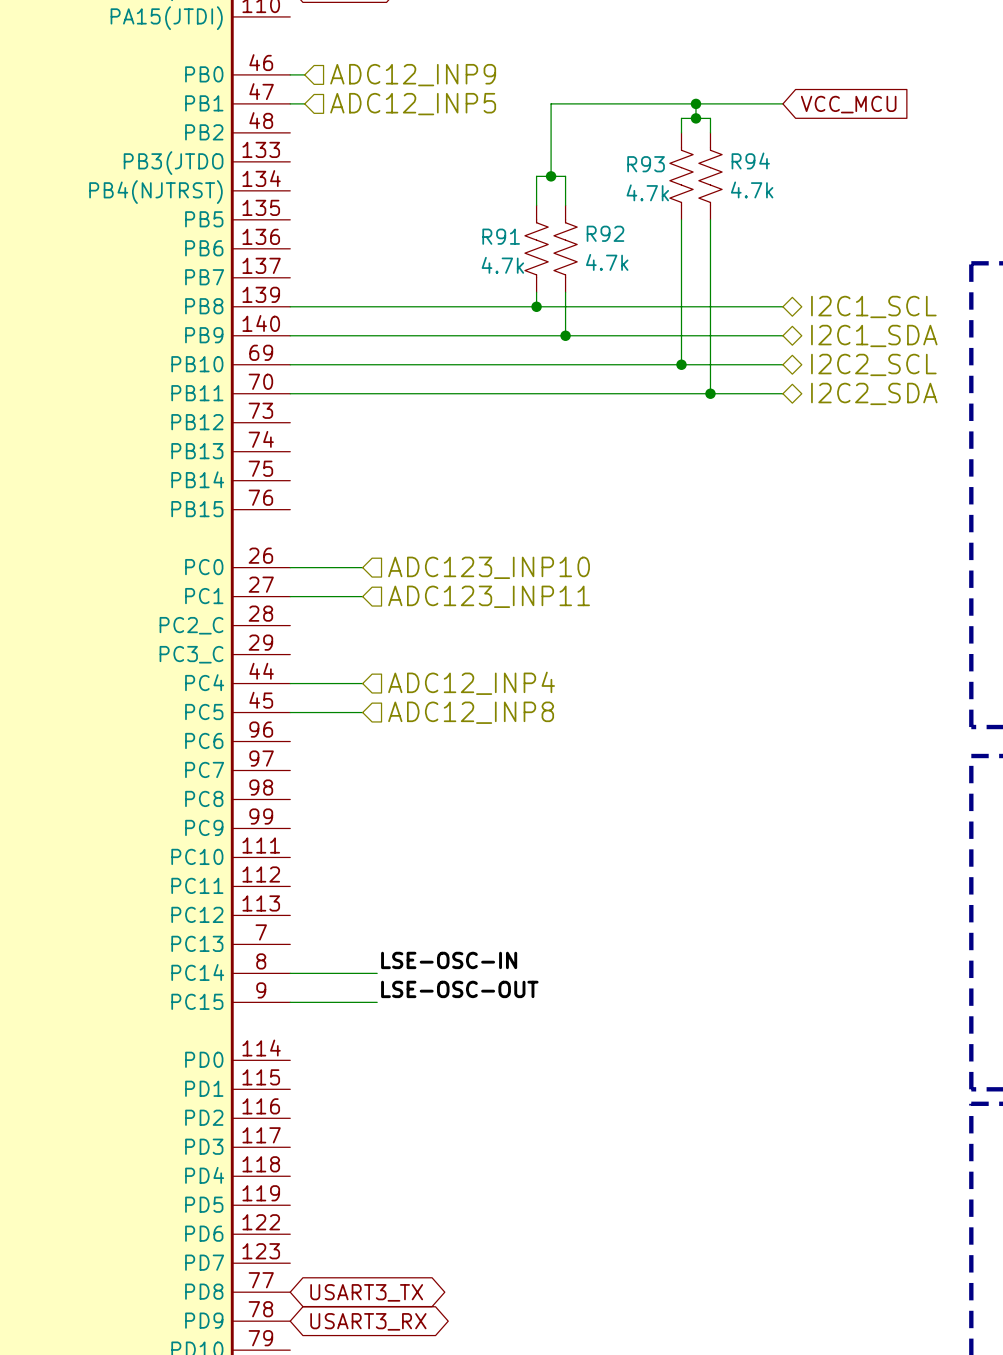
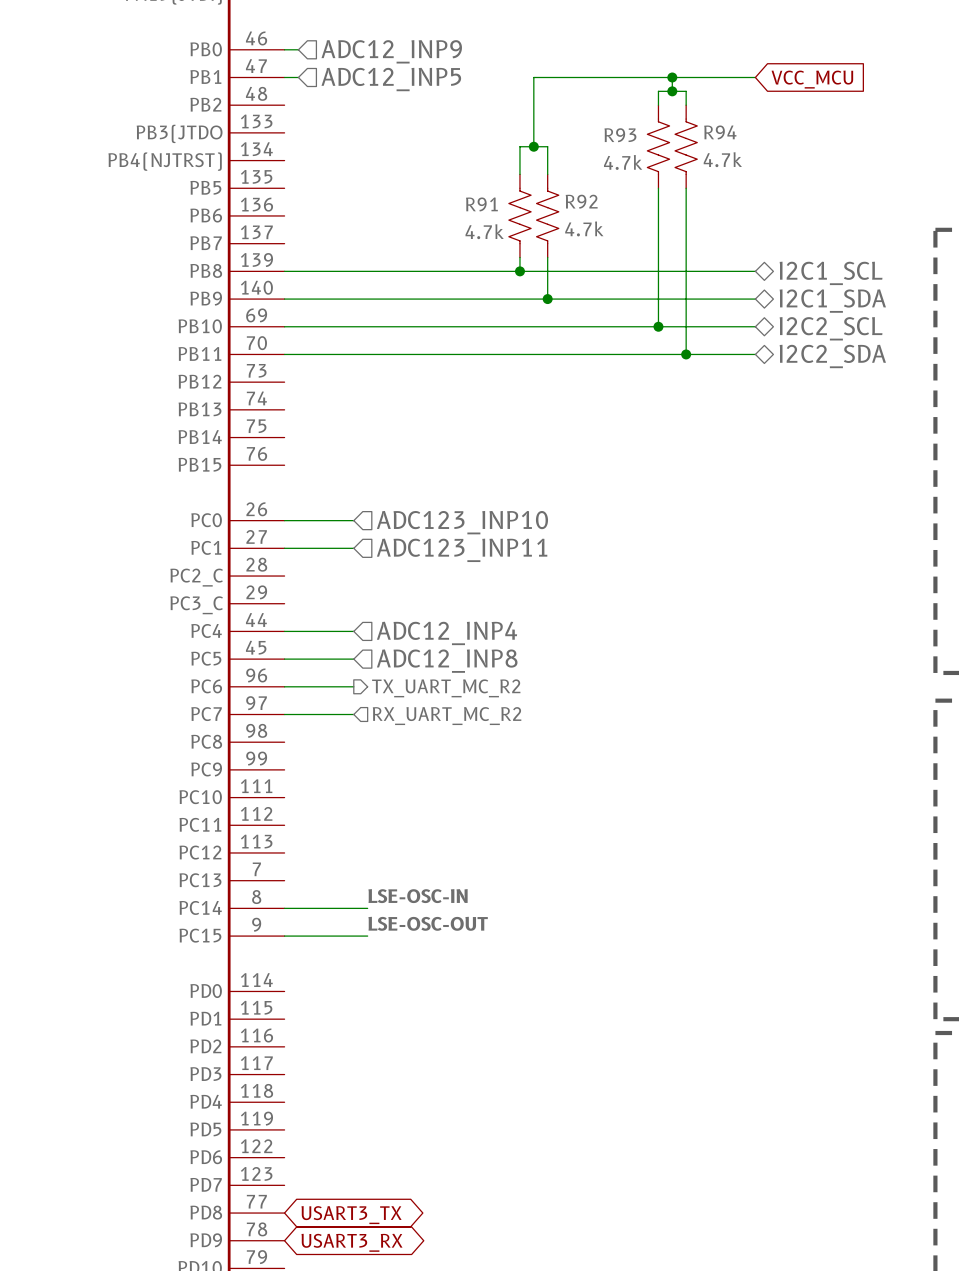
wire: none -> (284, 686) (353, 686)
hierarchical label: none -> TX_UART_MC_R2 (446, 688)
wire: none -> (284, 714) (353, 714)
hierarchical label: none -> RX_UART_MC_R2 (447, 716)

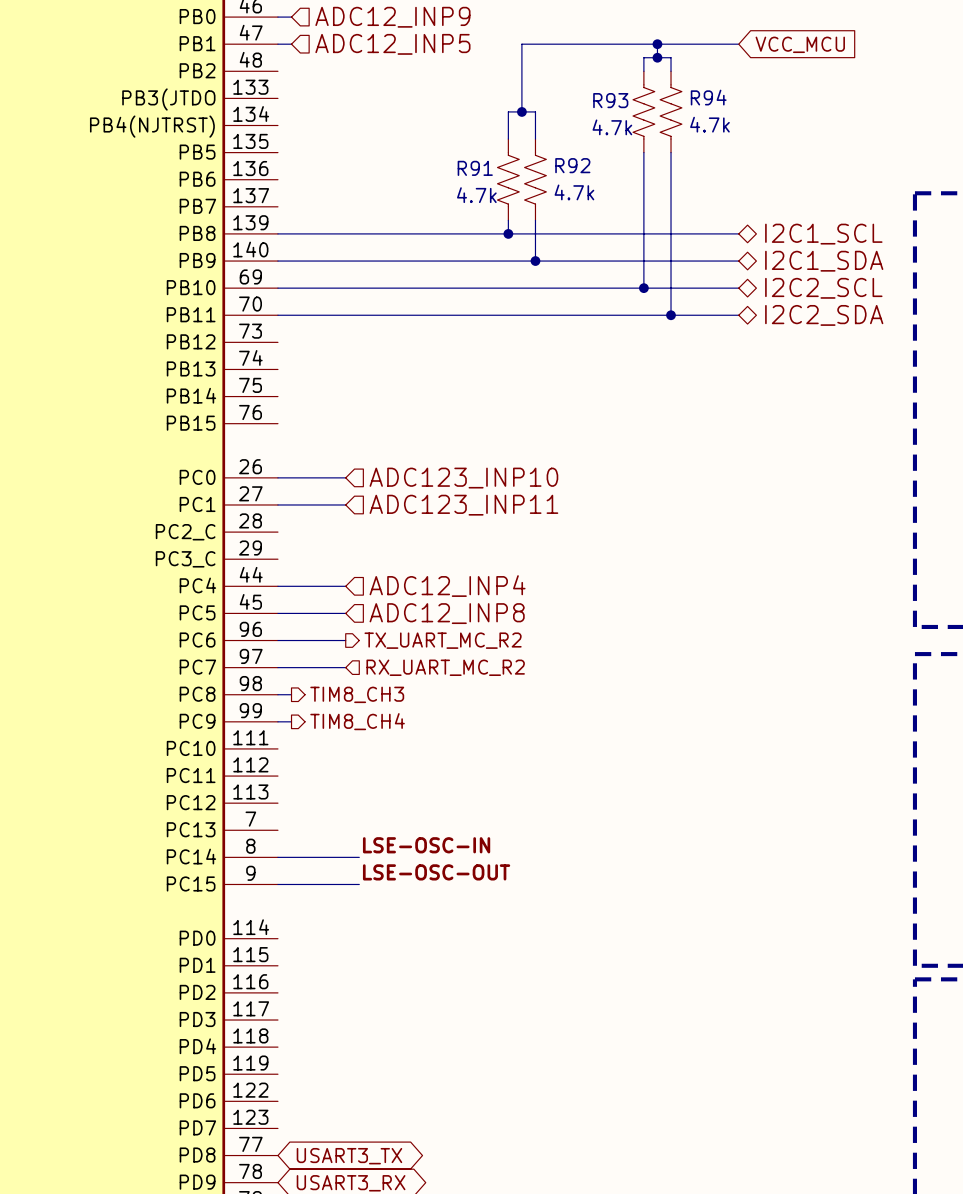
wire: none -> (277, 694) (291, 694)
hierarchical label: none -> TIM8_CH3 (357, 694)
wire: none -> (277, 721) (291, 721)
hierarchical label: none -> TIM8_CH4 (357, 721)

